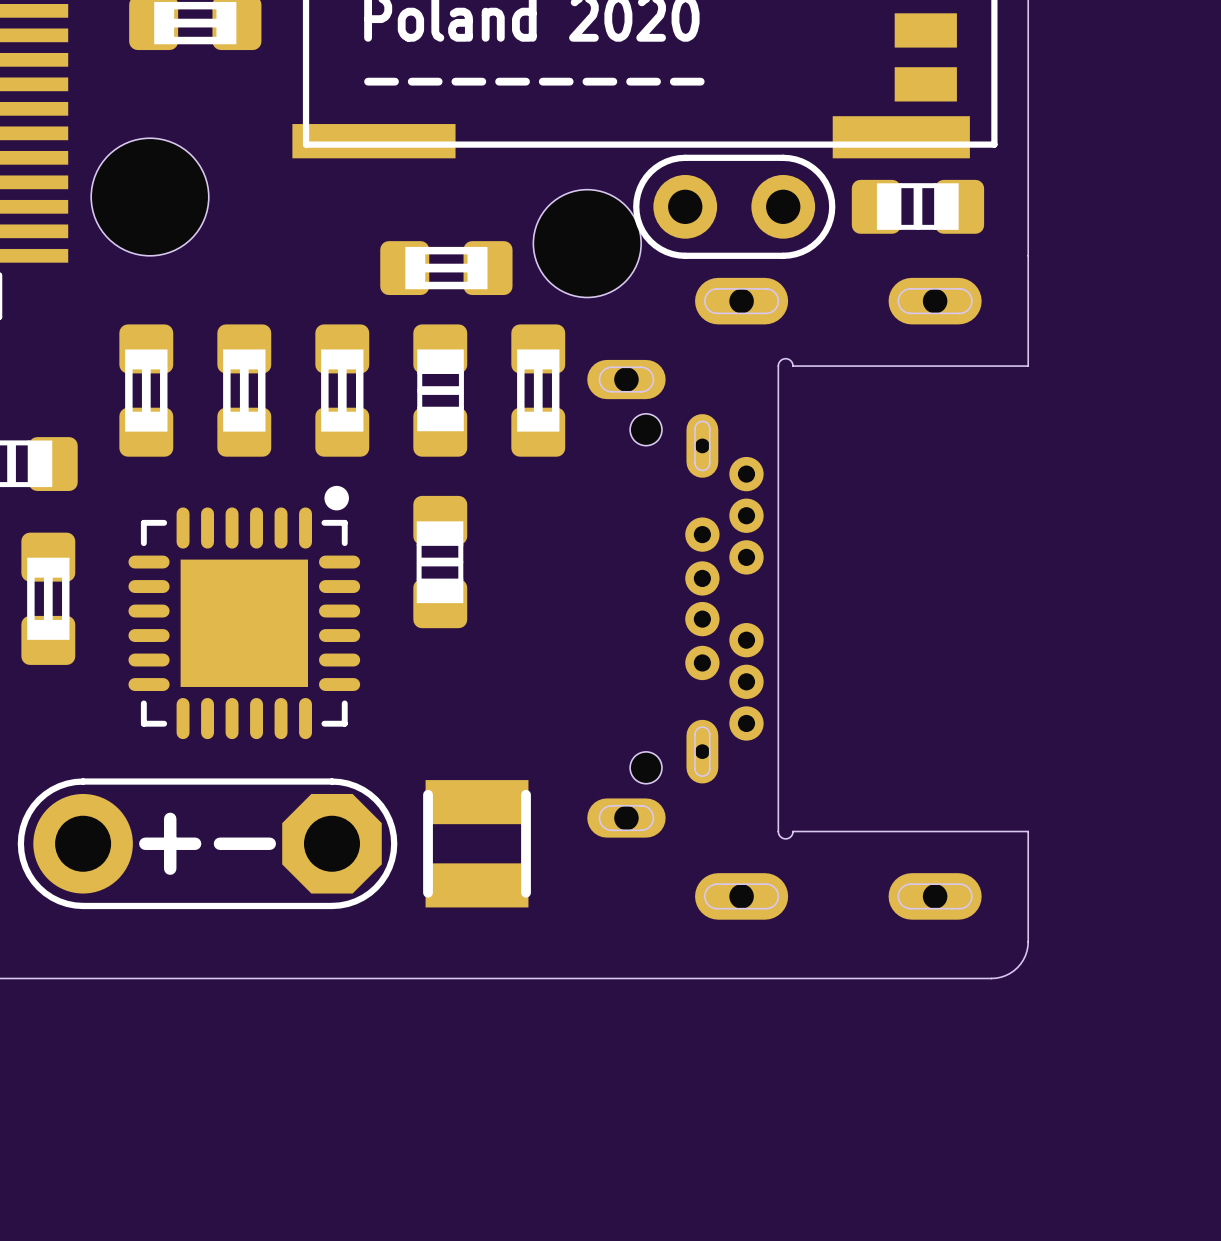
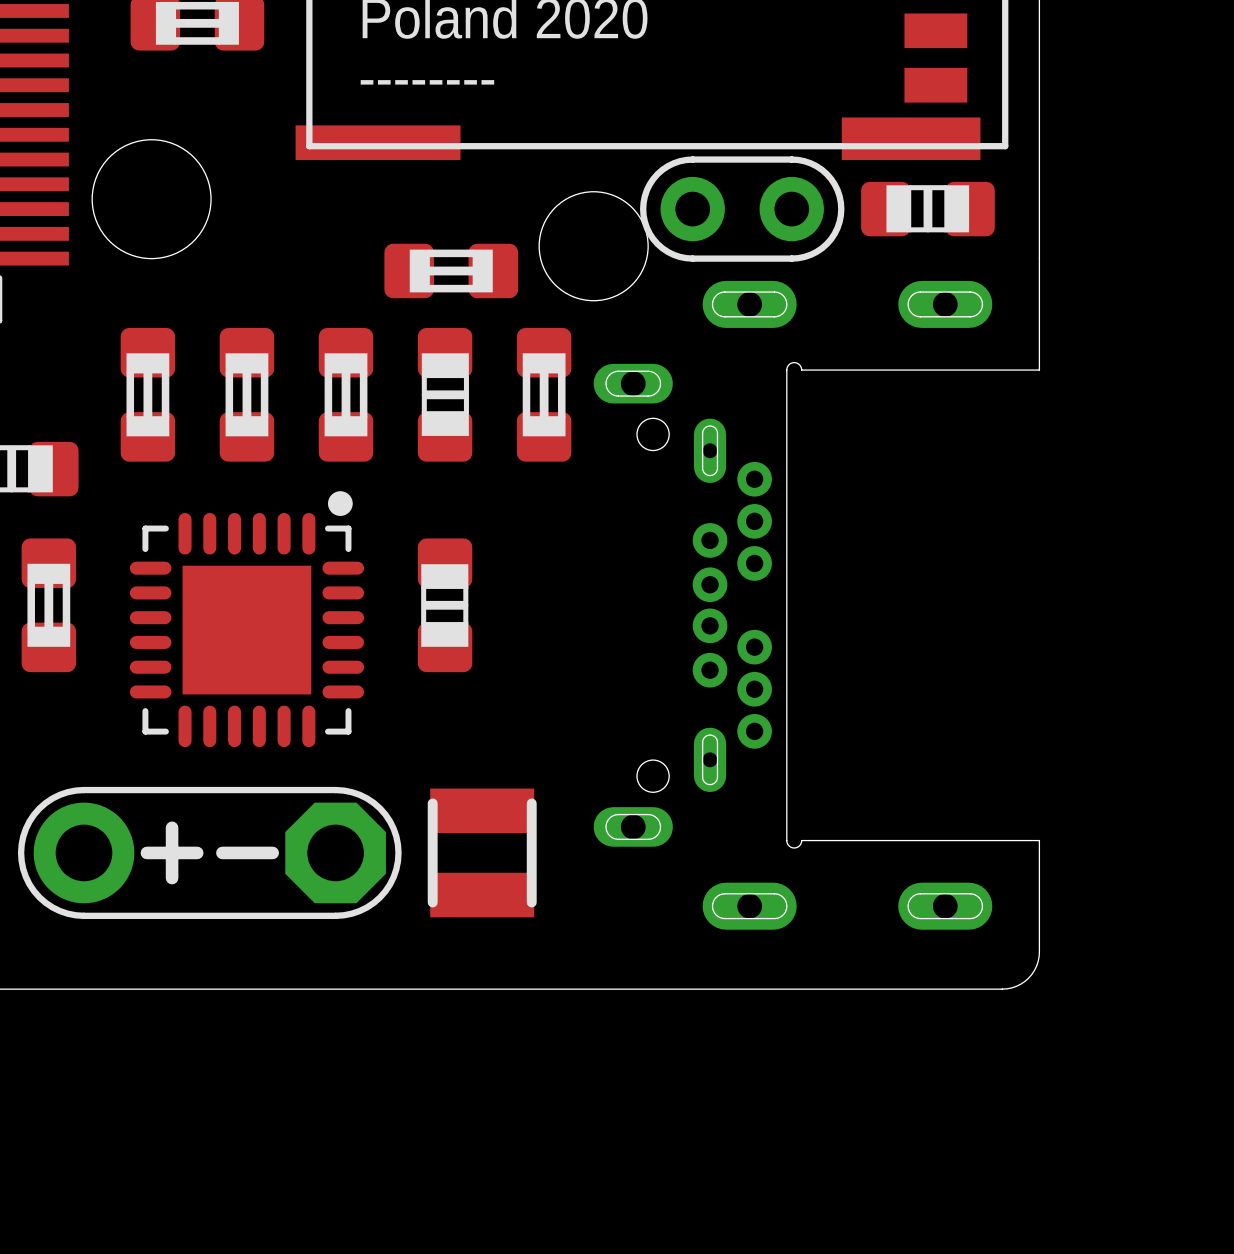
part position: (440, 562) -> (445, 605)

